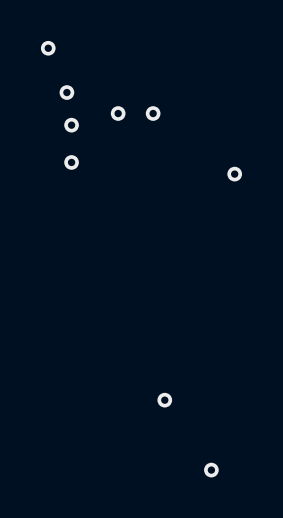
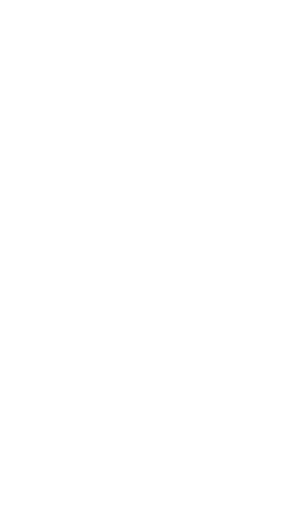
via: (48, 48) -> none
via: (66, 92) -> none
via: (118, 113) -> none
via: (153, 113) -> none
via: (71, 125) -> none
via: (71, 162) -> none
via: (234, 174) -> none
via: (164, 400) -> none
via: (211, 470) -> none

